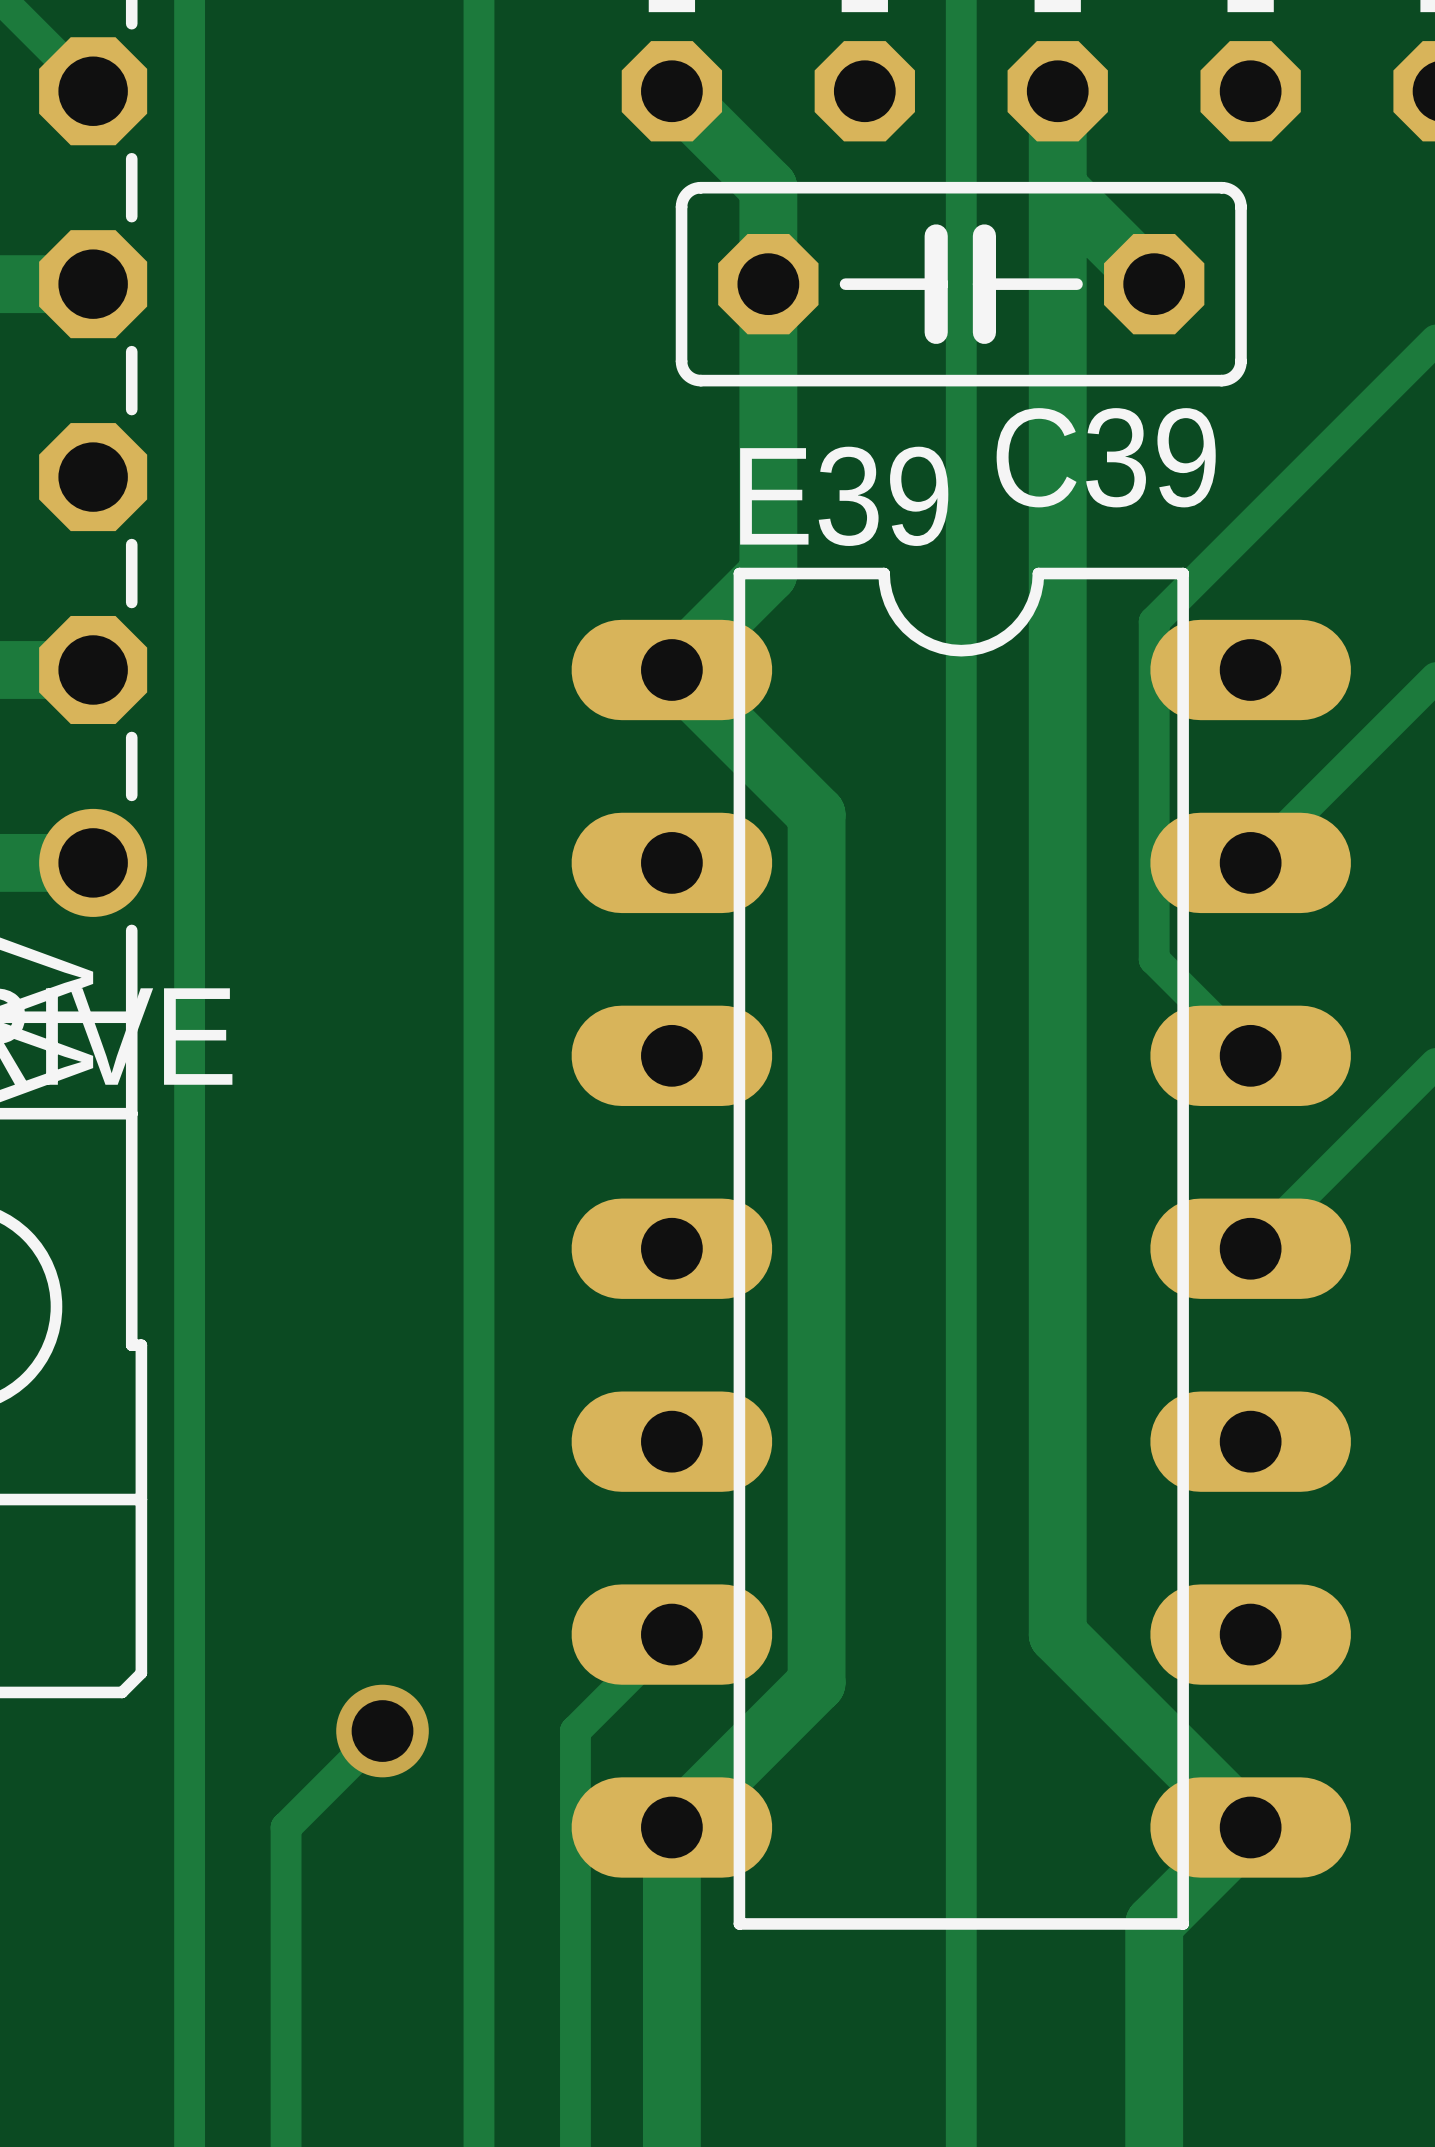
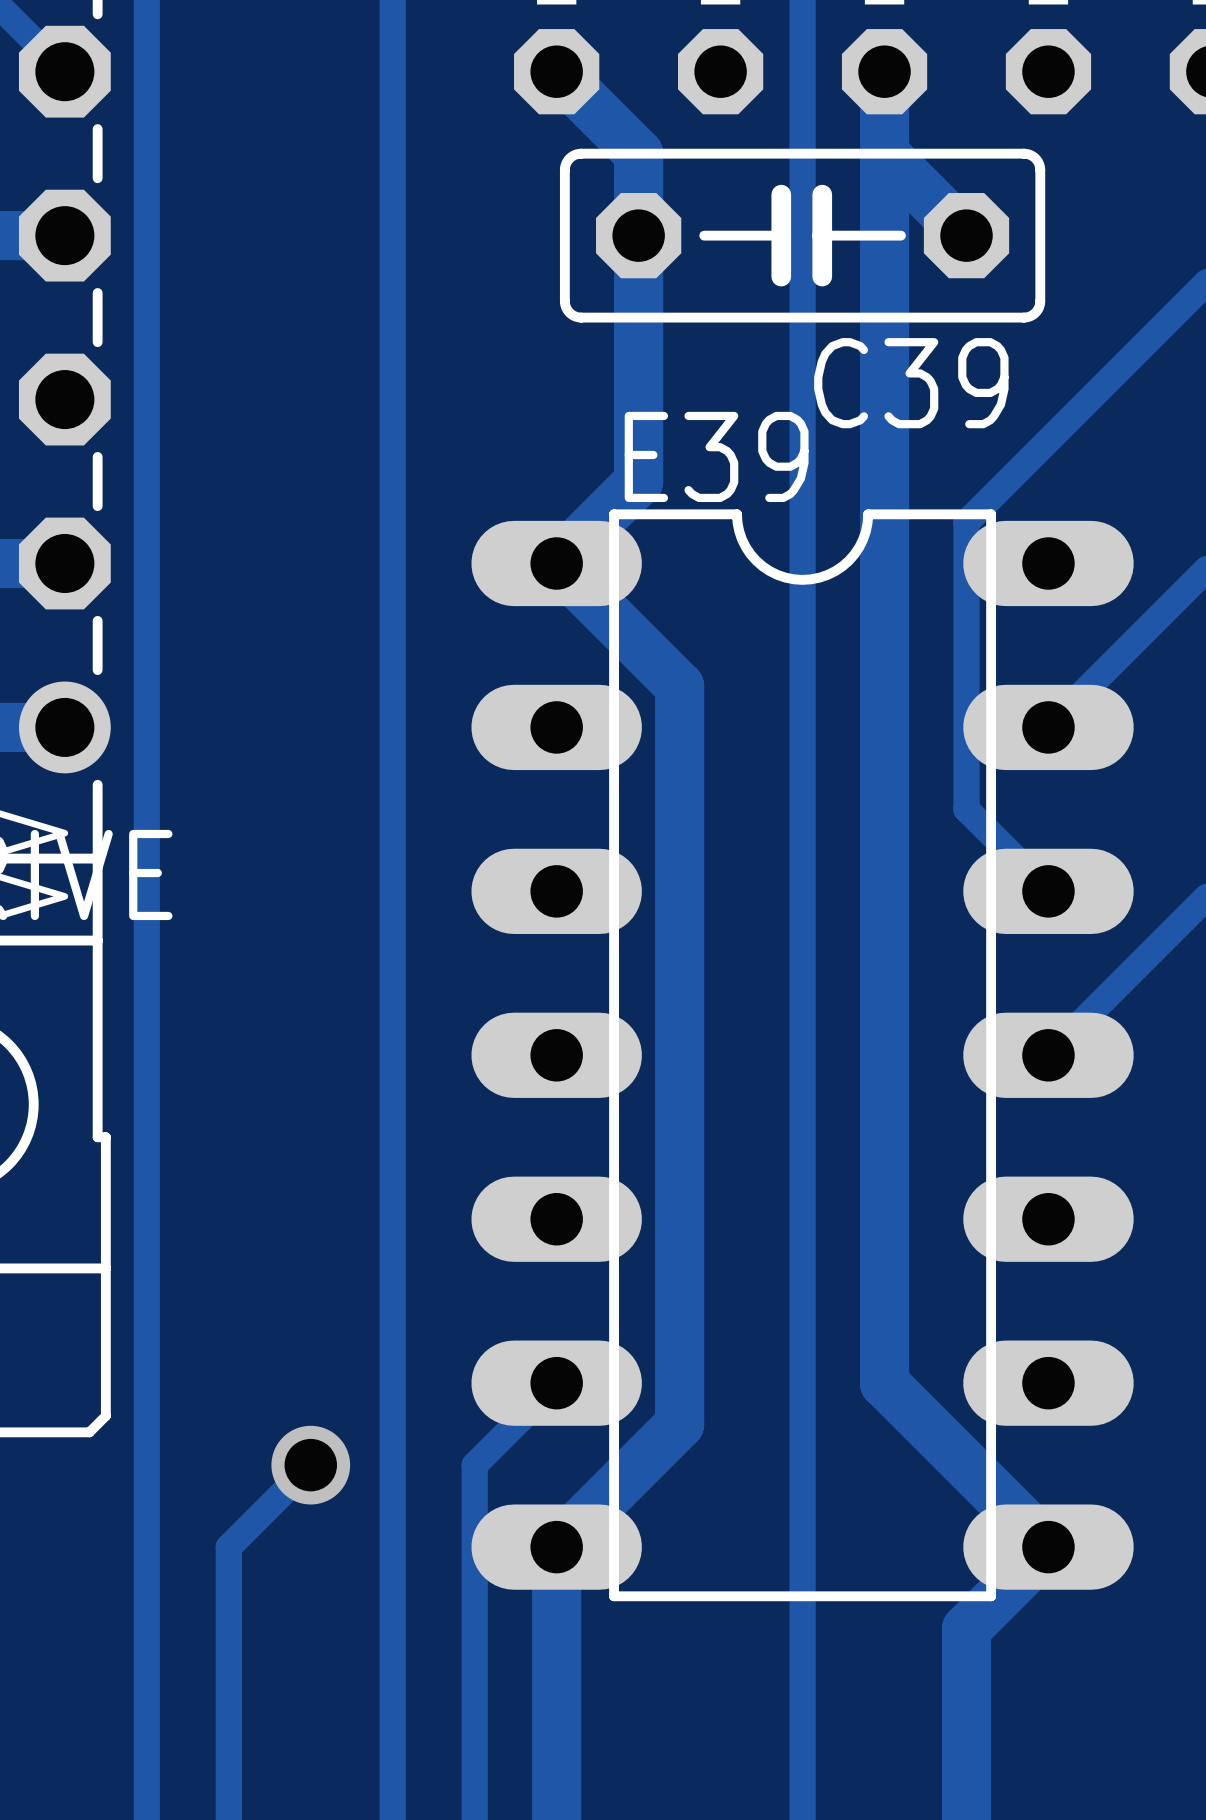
E39 name position: E39 (844, 496) -> E39 (716, 456)
E39 footprint: [571, 567, 1351, 1930] -> [471, 509, 1134, 1602]

